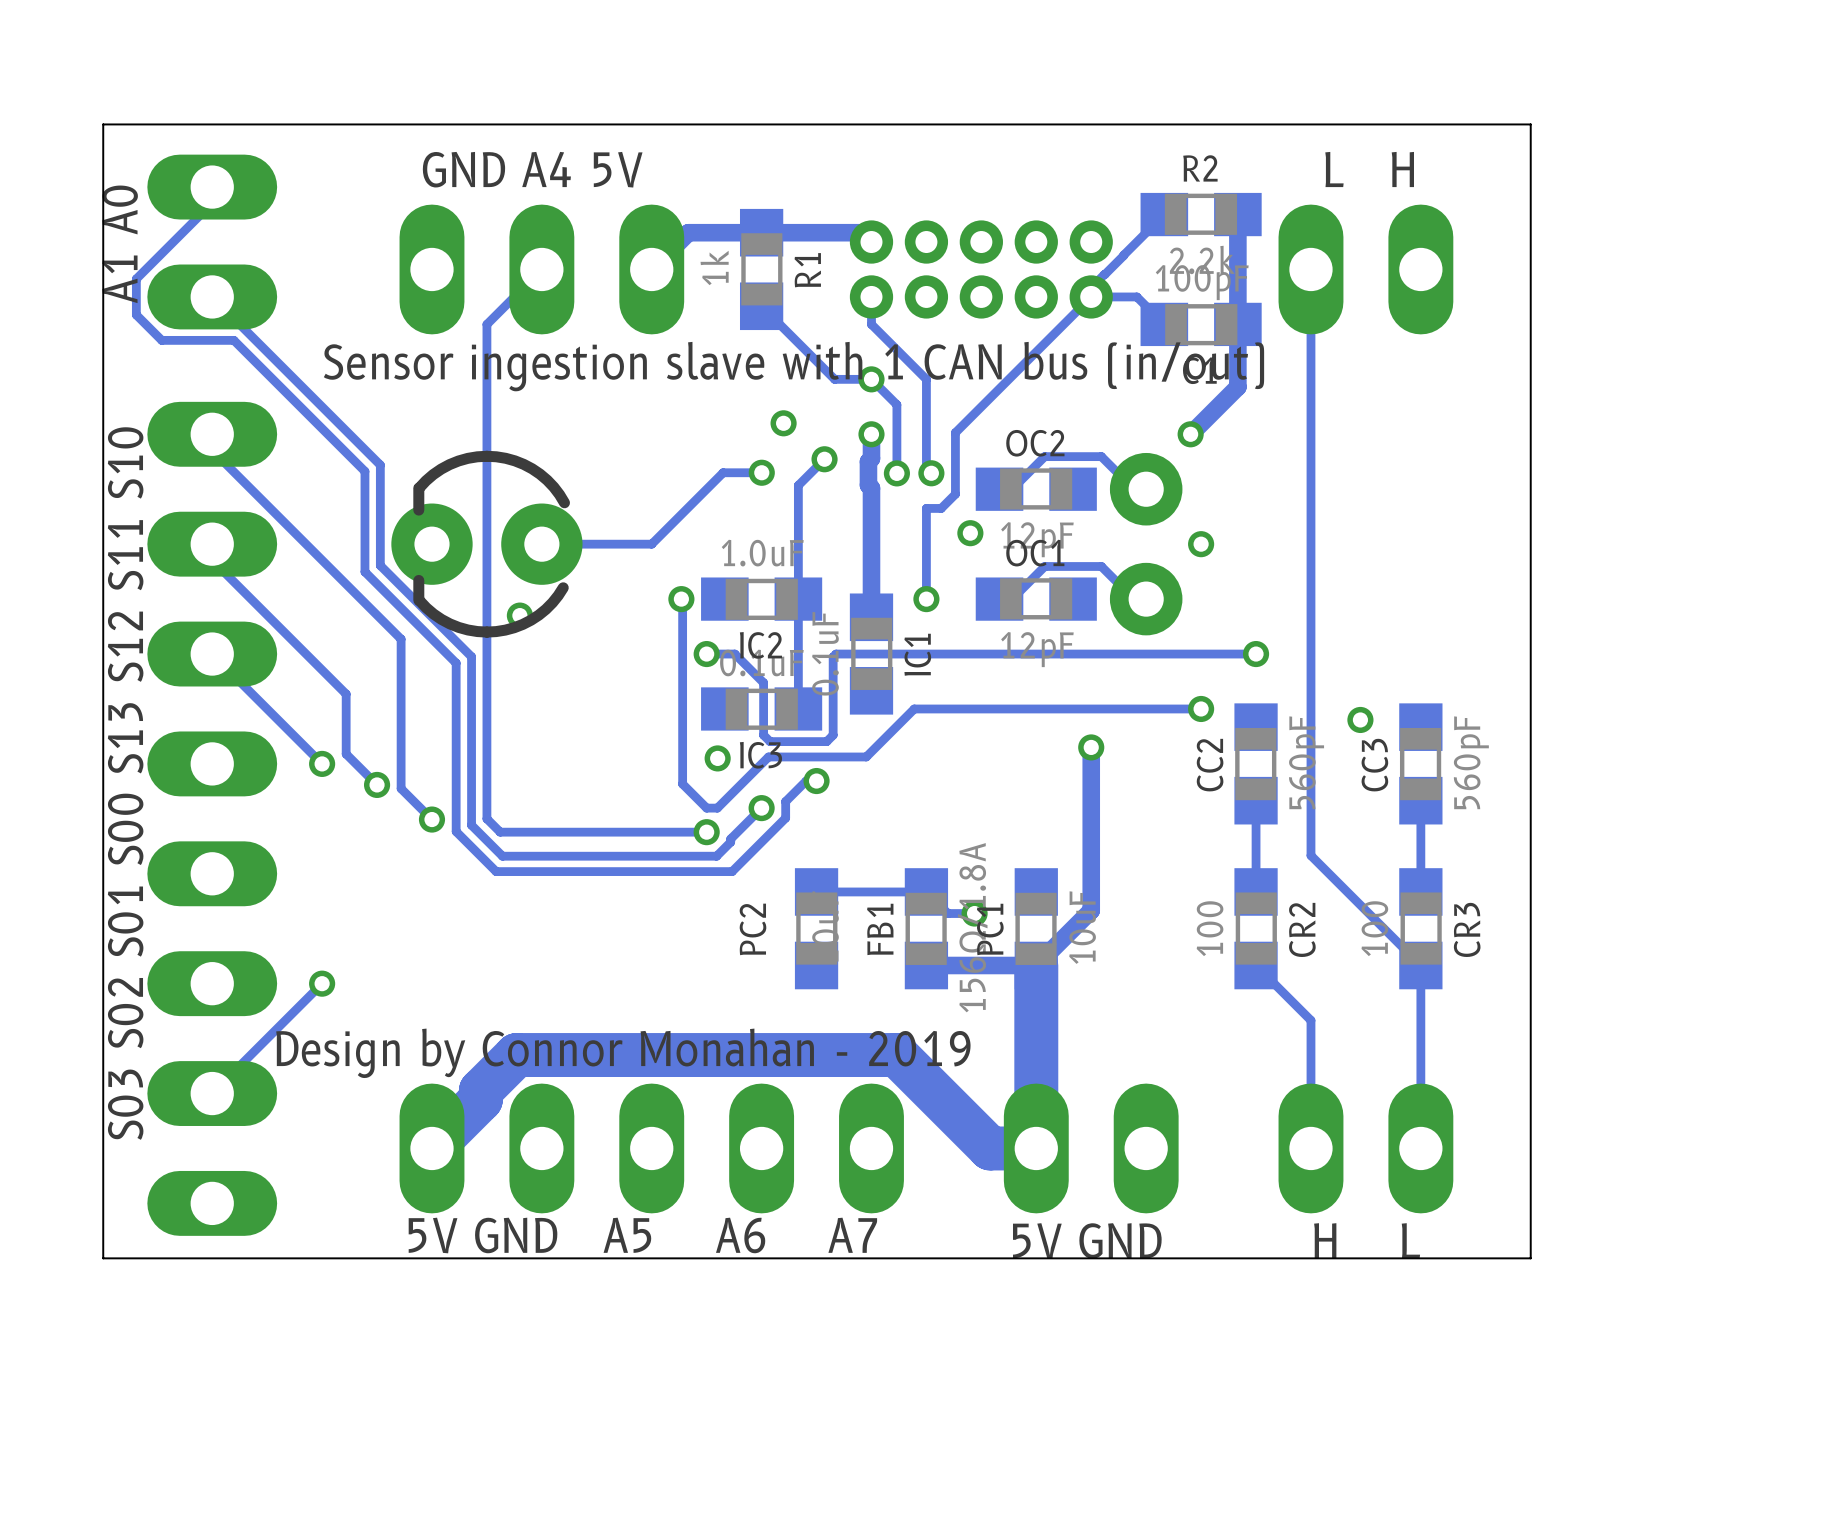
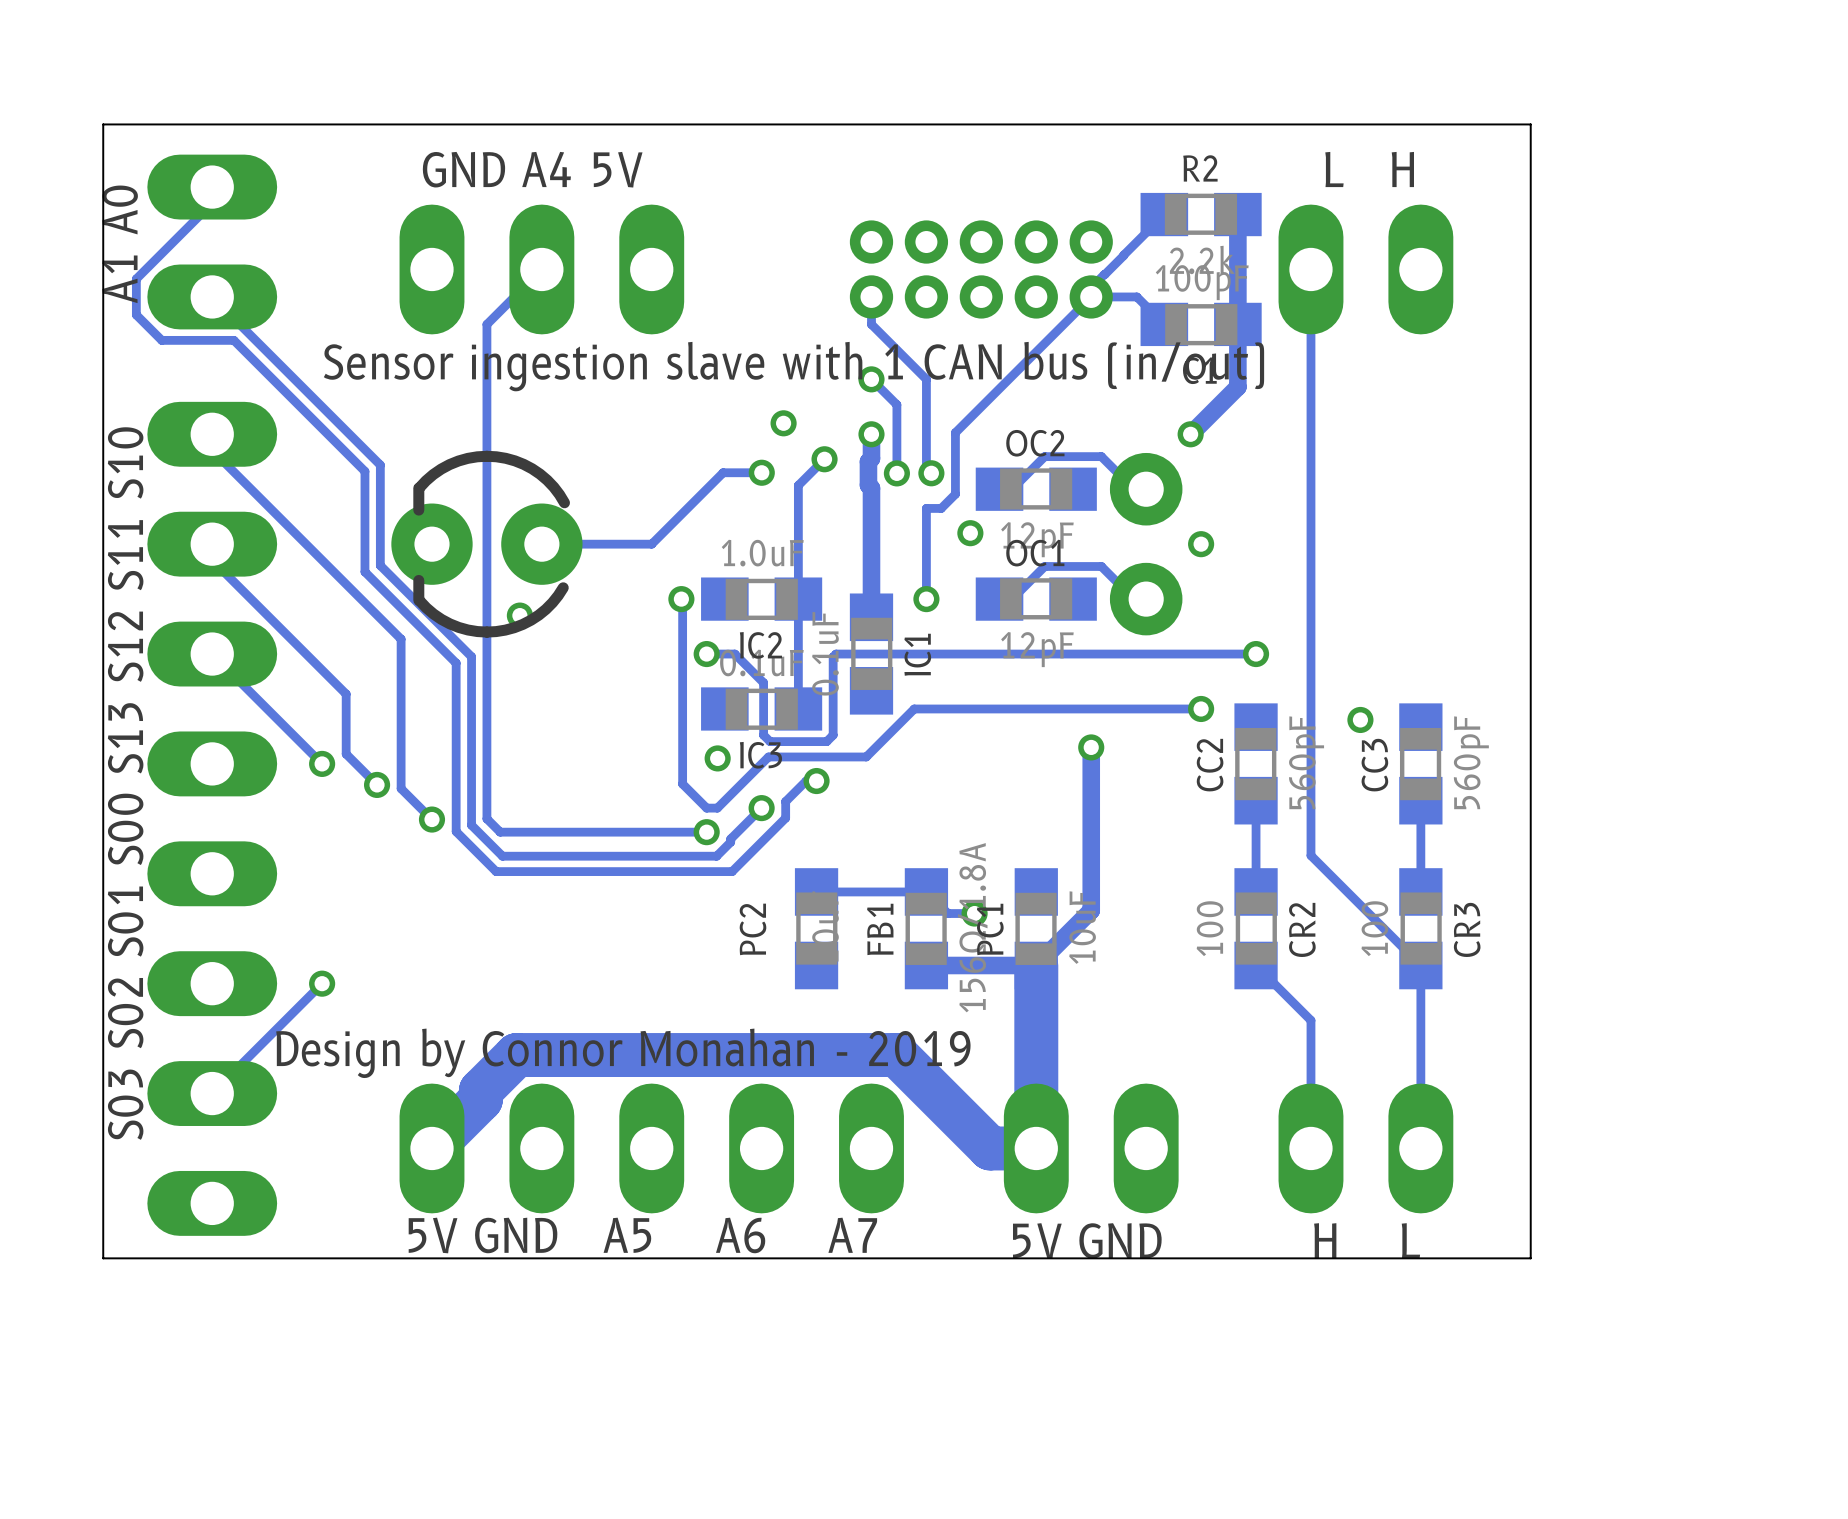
track: (871, 242) (862, 232) (688, 232) (651, 269) -> none
R1: 1k (761, 269) -> none
track: (761, 306) (834, 379) (871, 379) -> none

